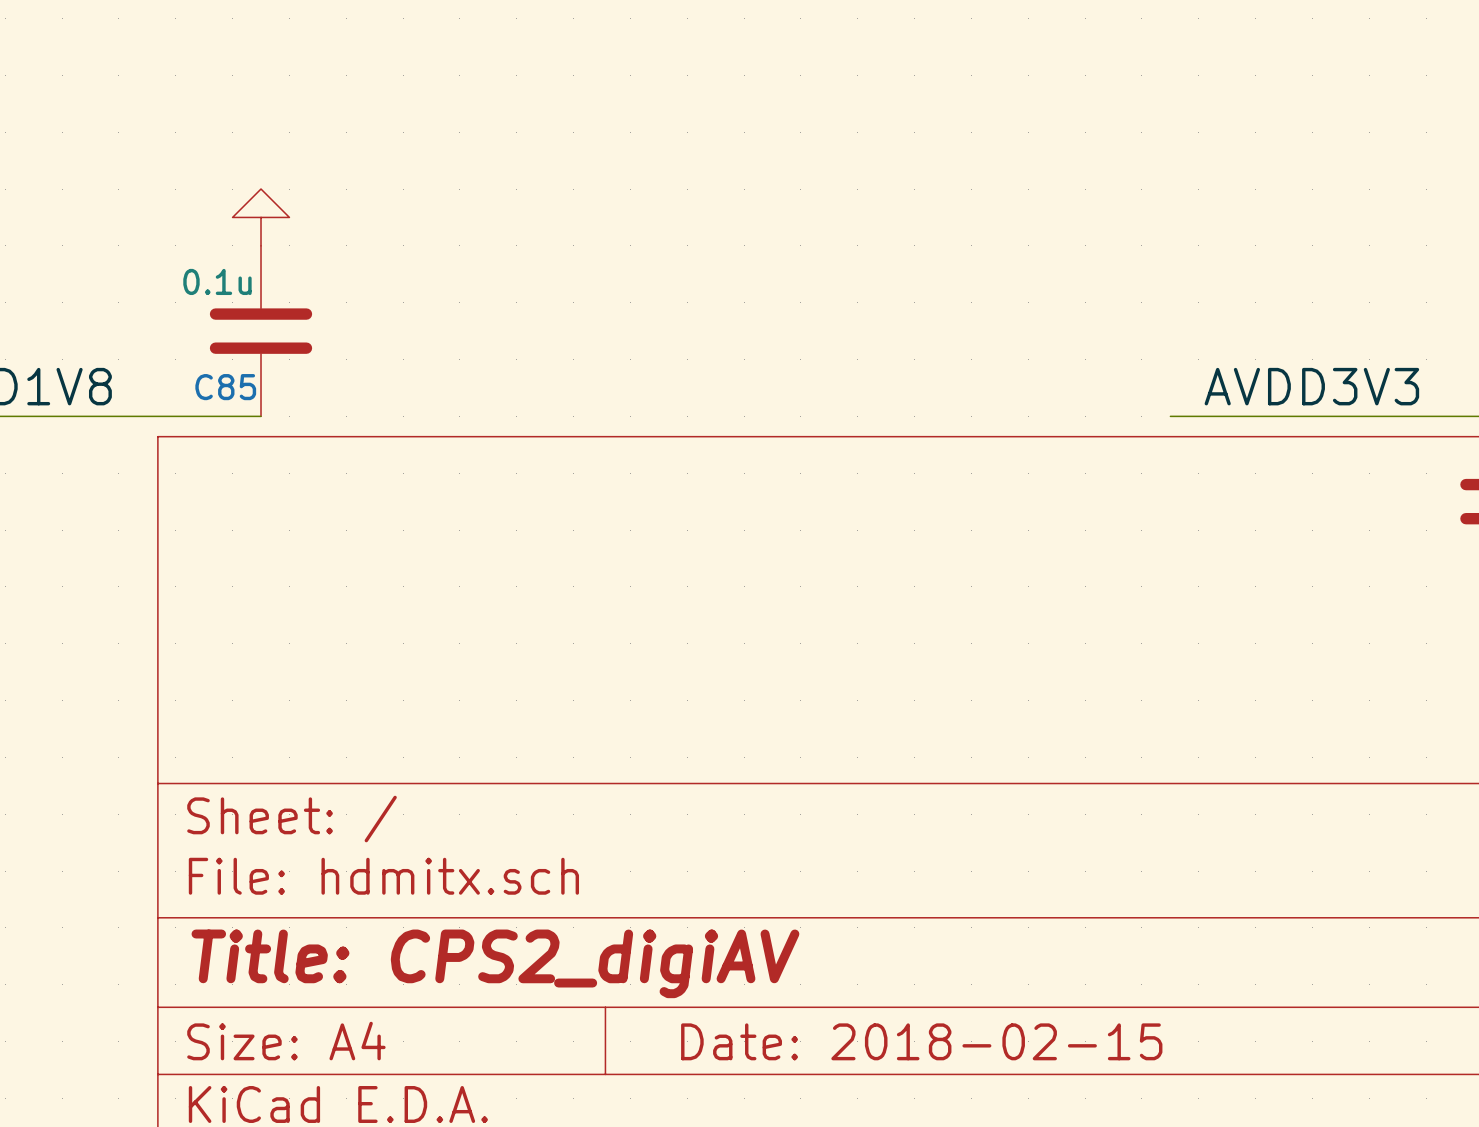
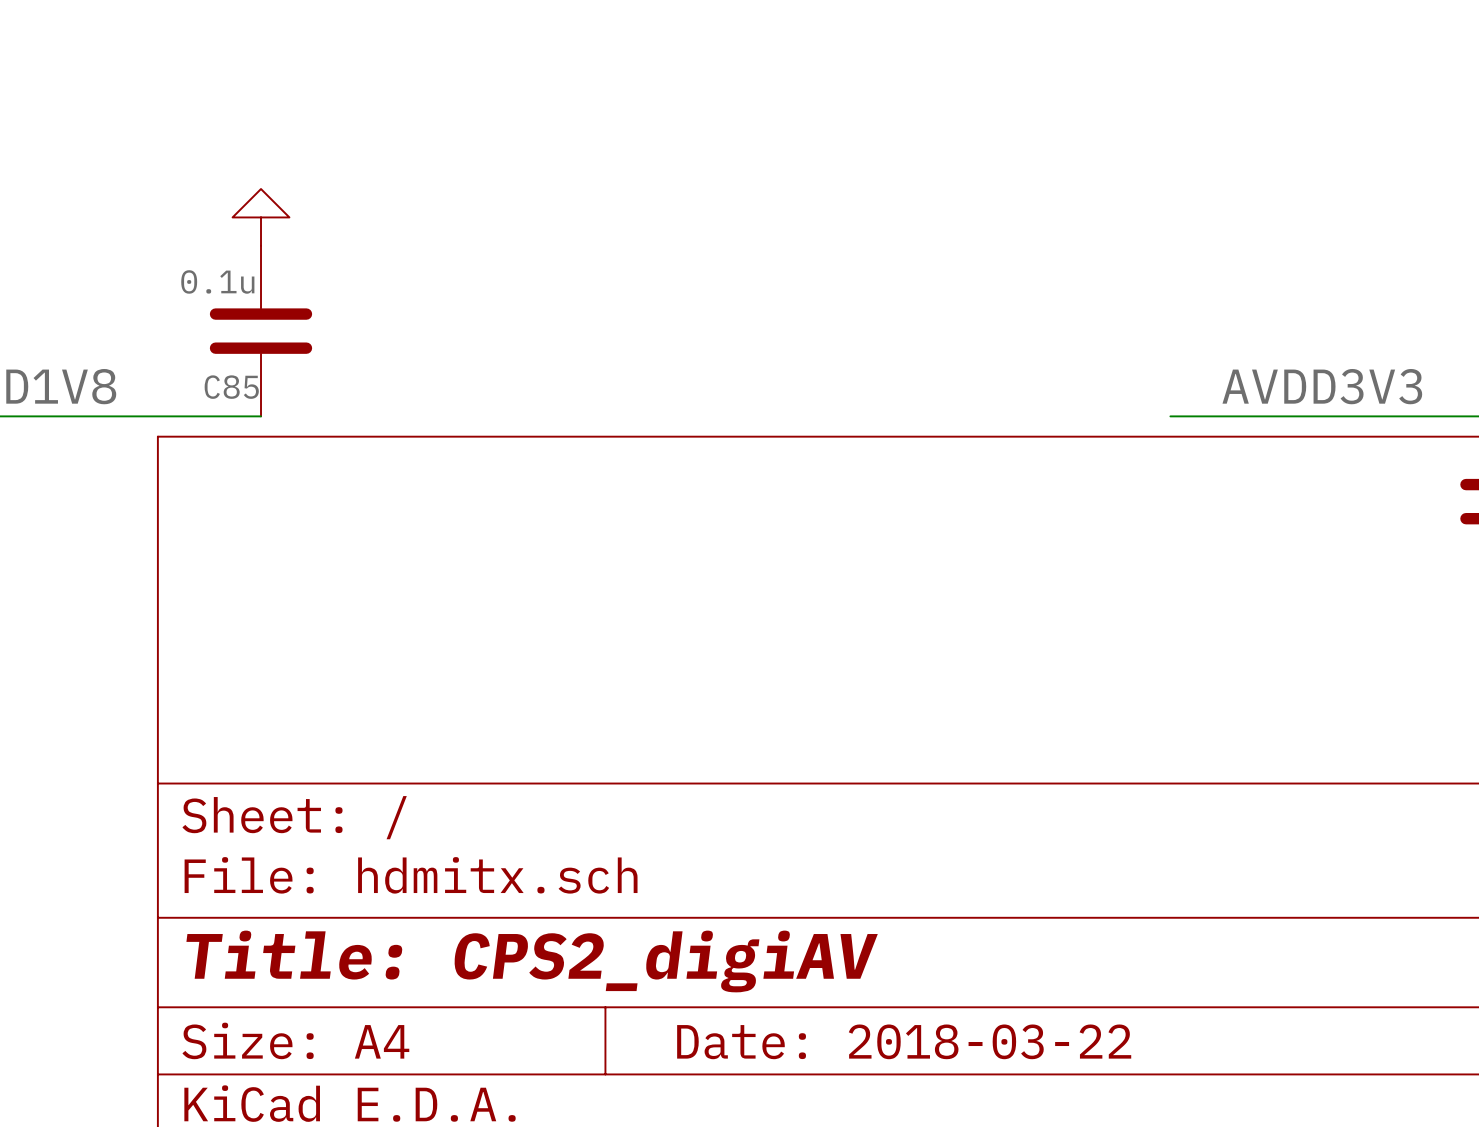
title block: Date: 2018-02-15 (921, 1041) -> Date: 2018-03-22 (904, 1041)

